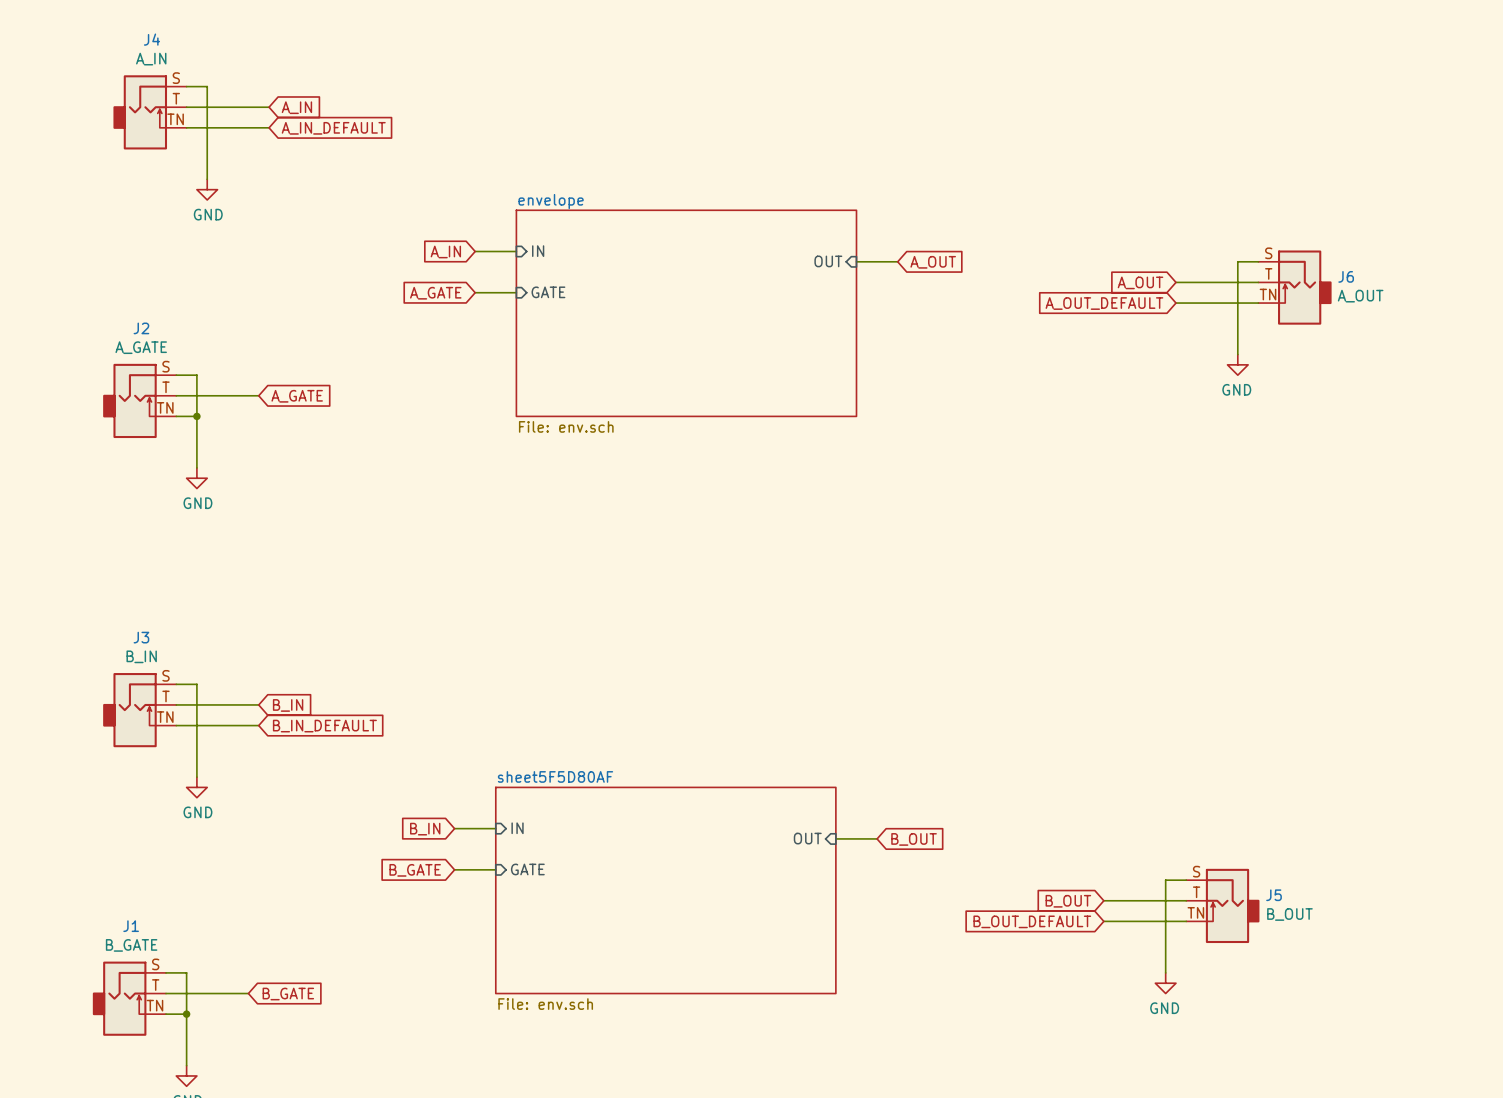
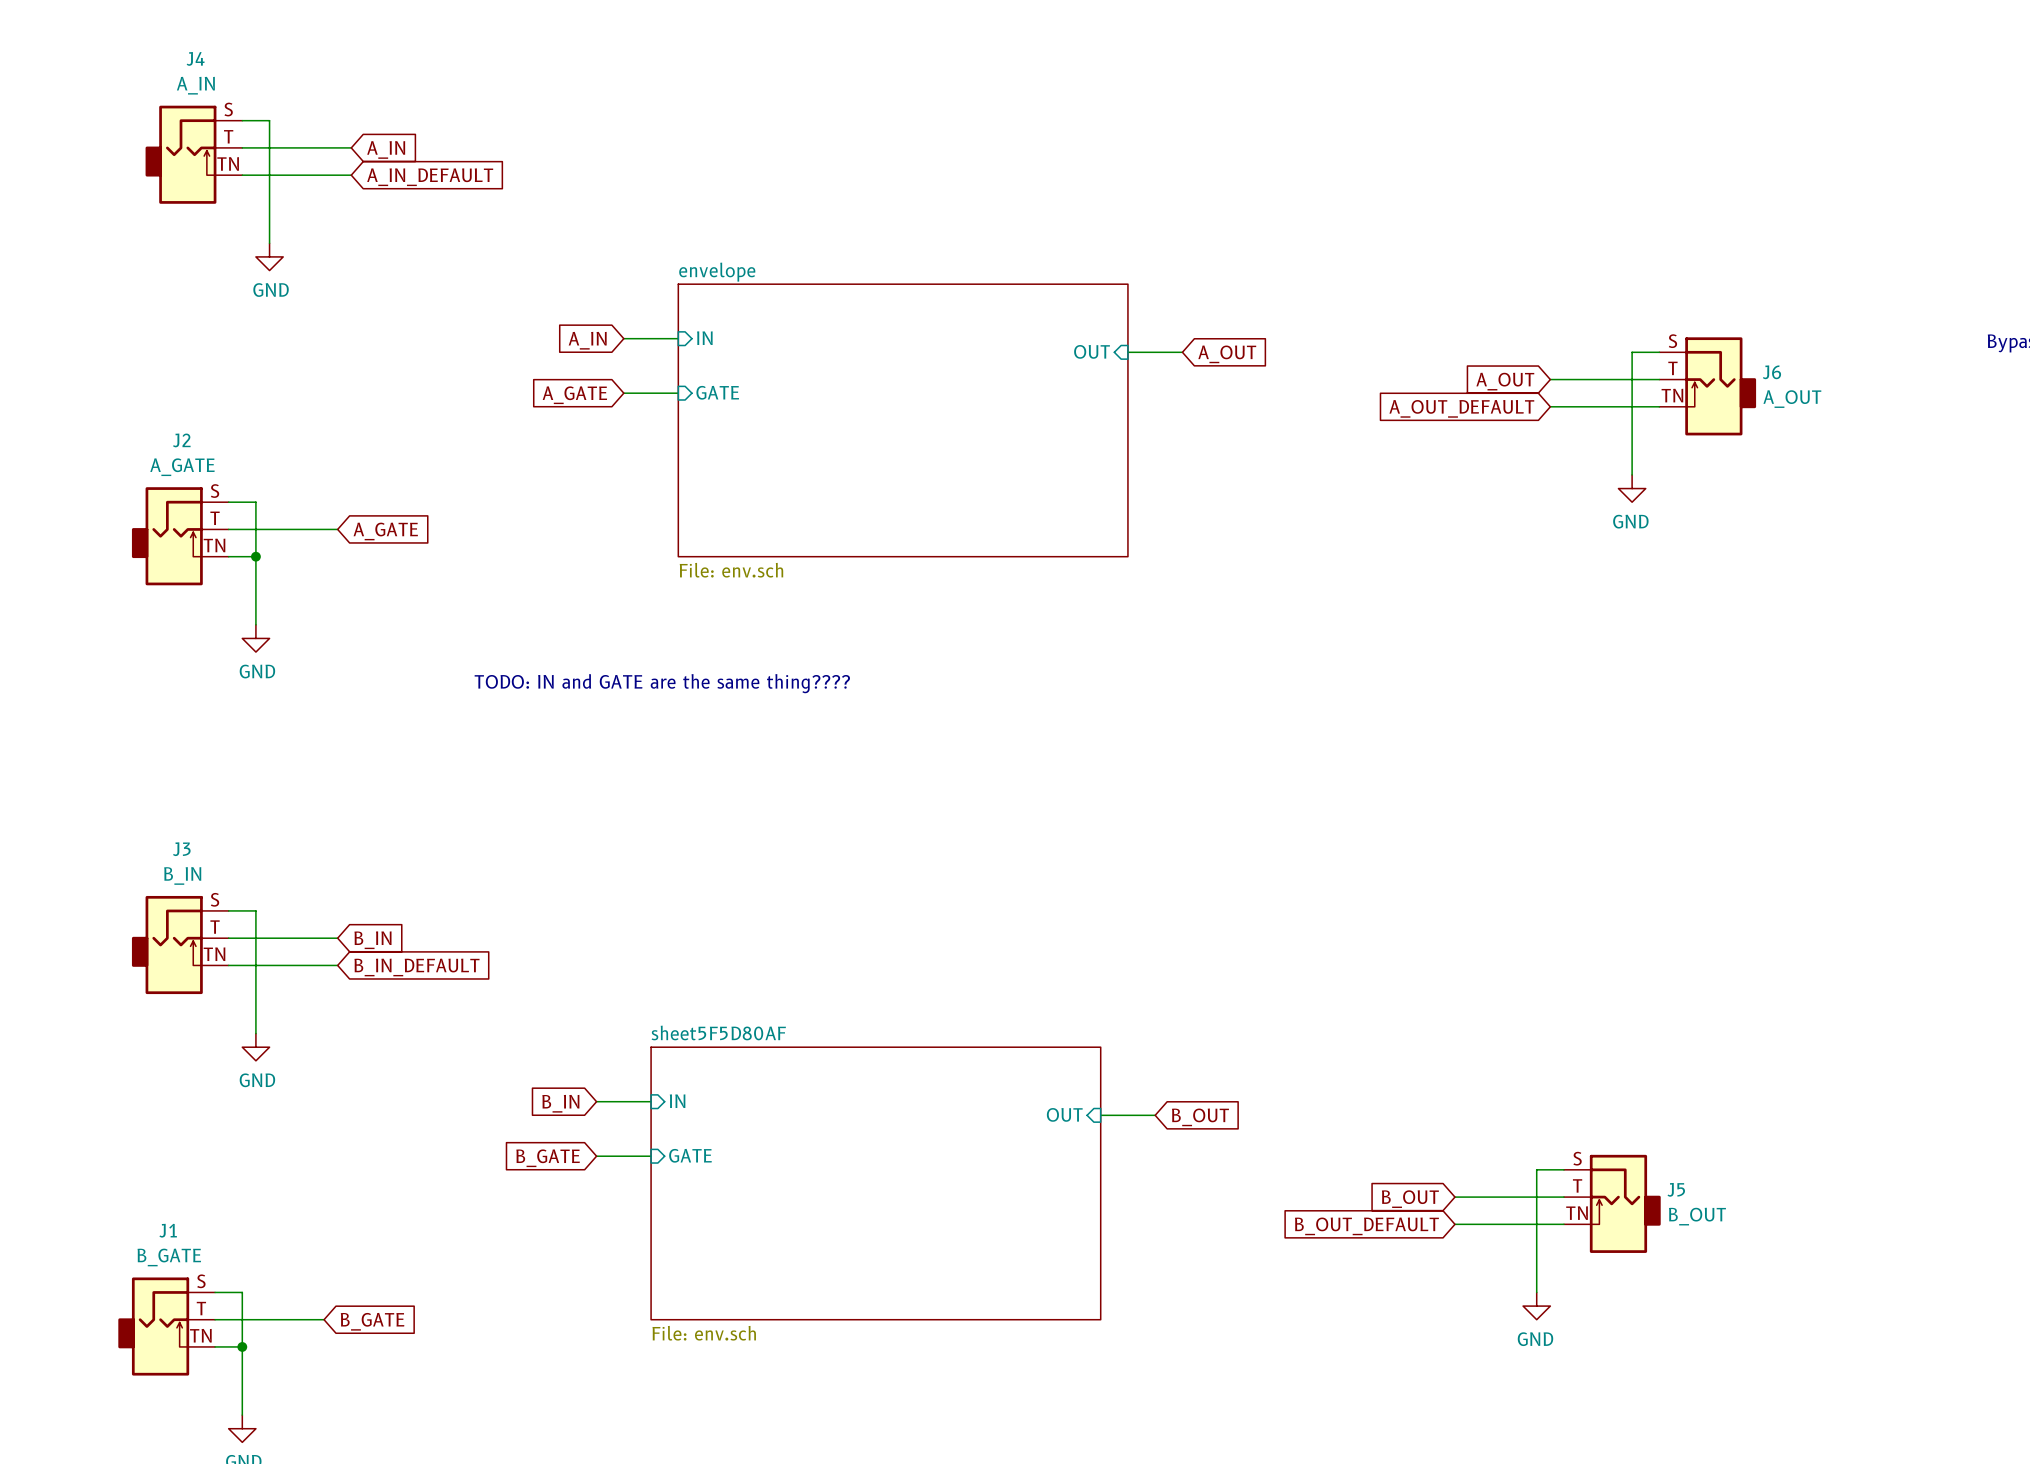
text: none -> TODO: IN and GATE are the same thing???? (662, 683)

